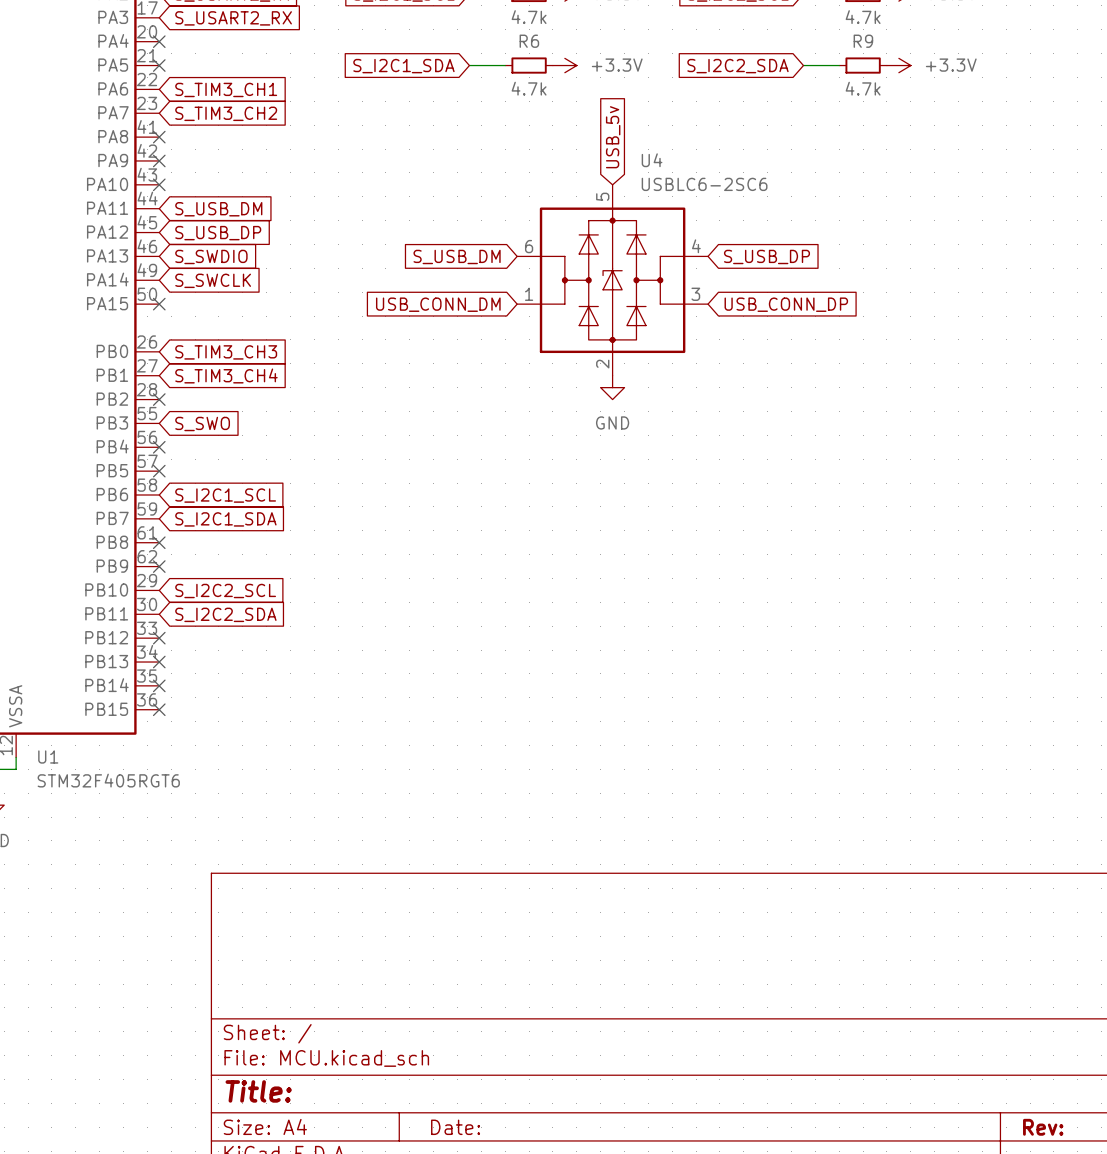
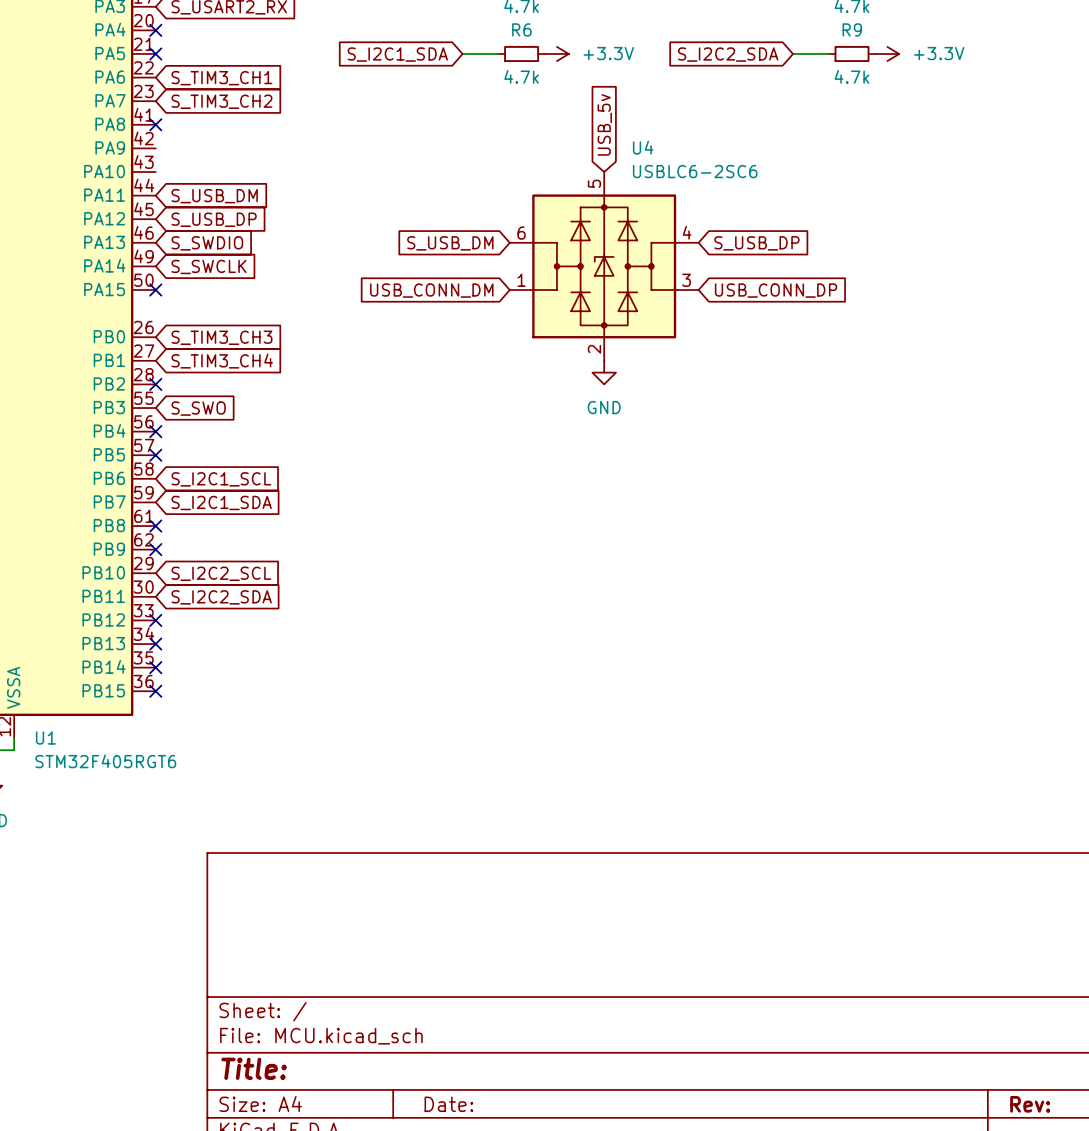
no-connect mark: (159, 160) -> none
no-connect mark: (159, 184) -> none

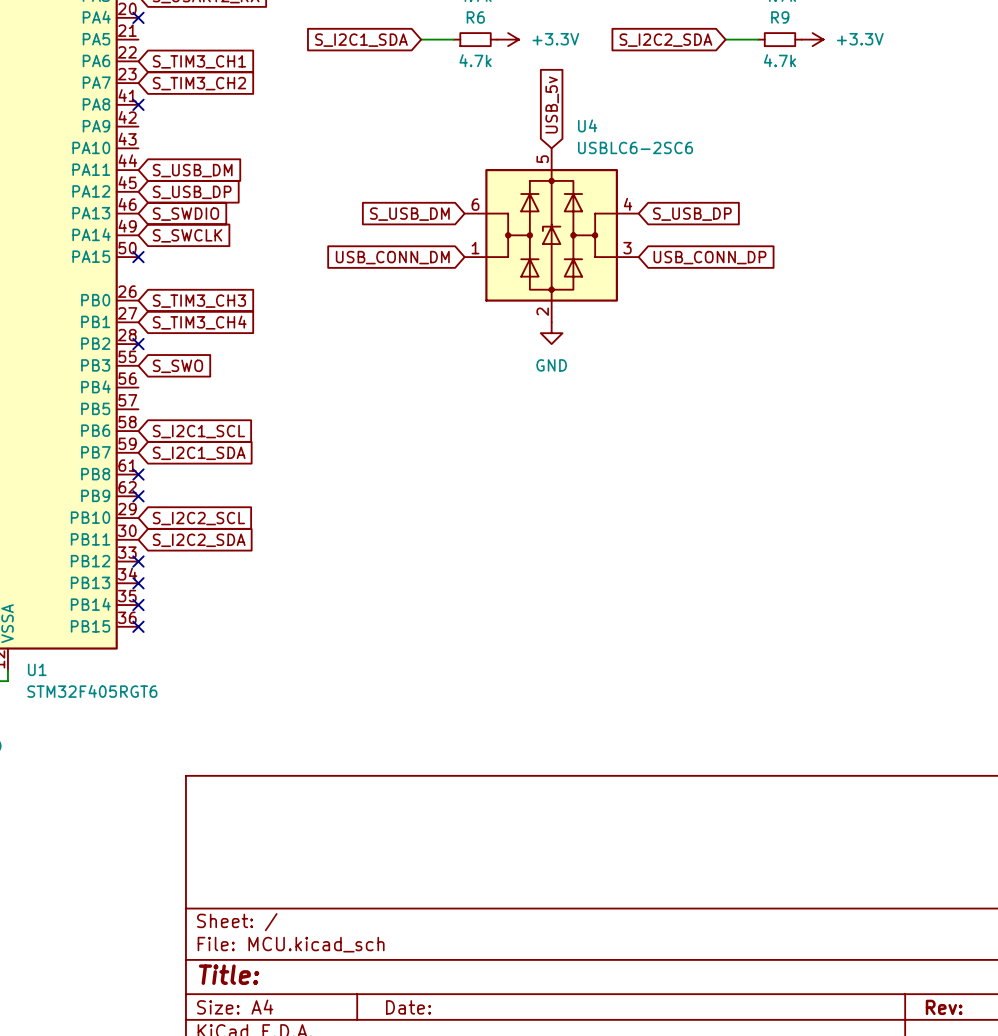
no-connect mark: (155, 53) -> none
no-connect mark: (155, 431) -> none
no-connect mark: (155, 455) -> none

